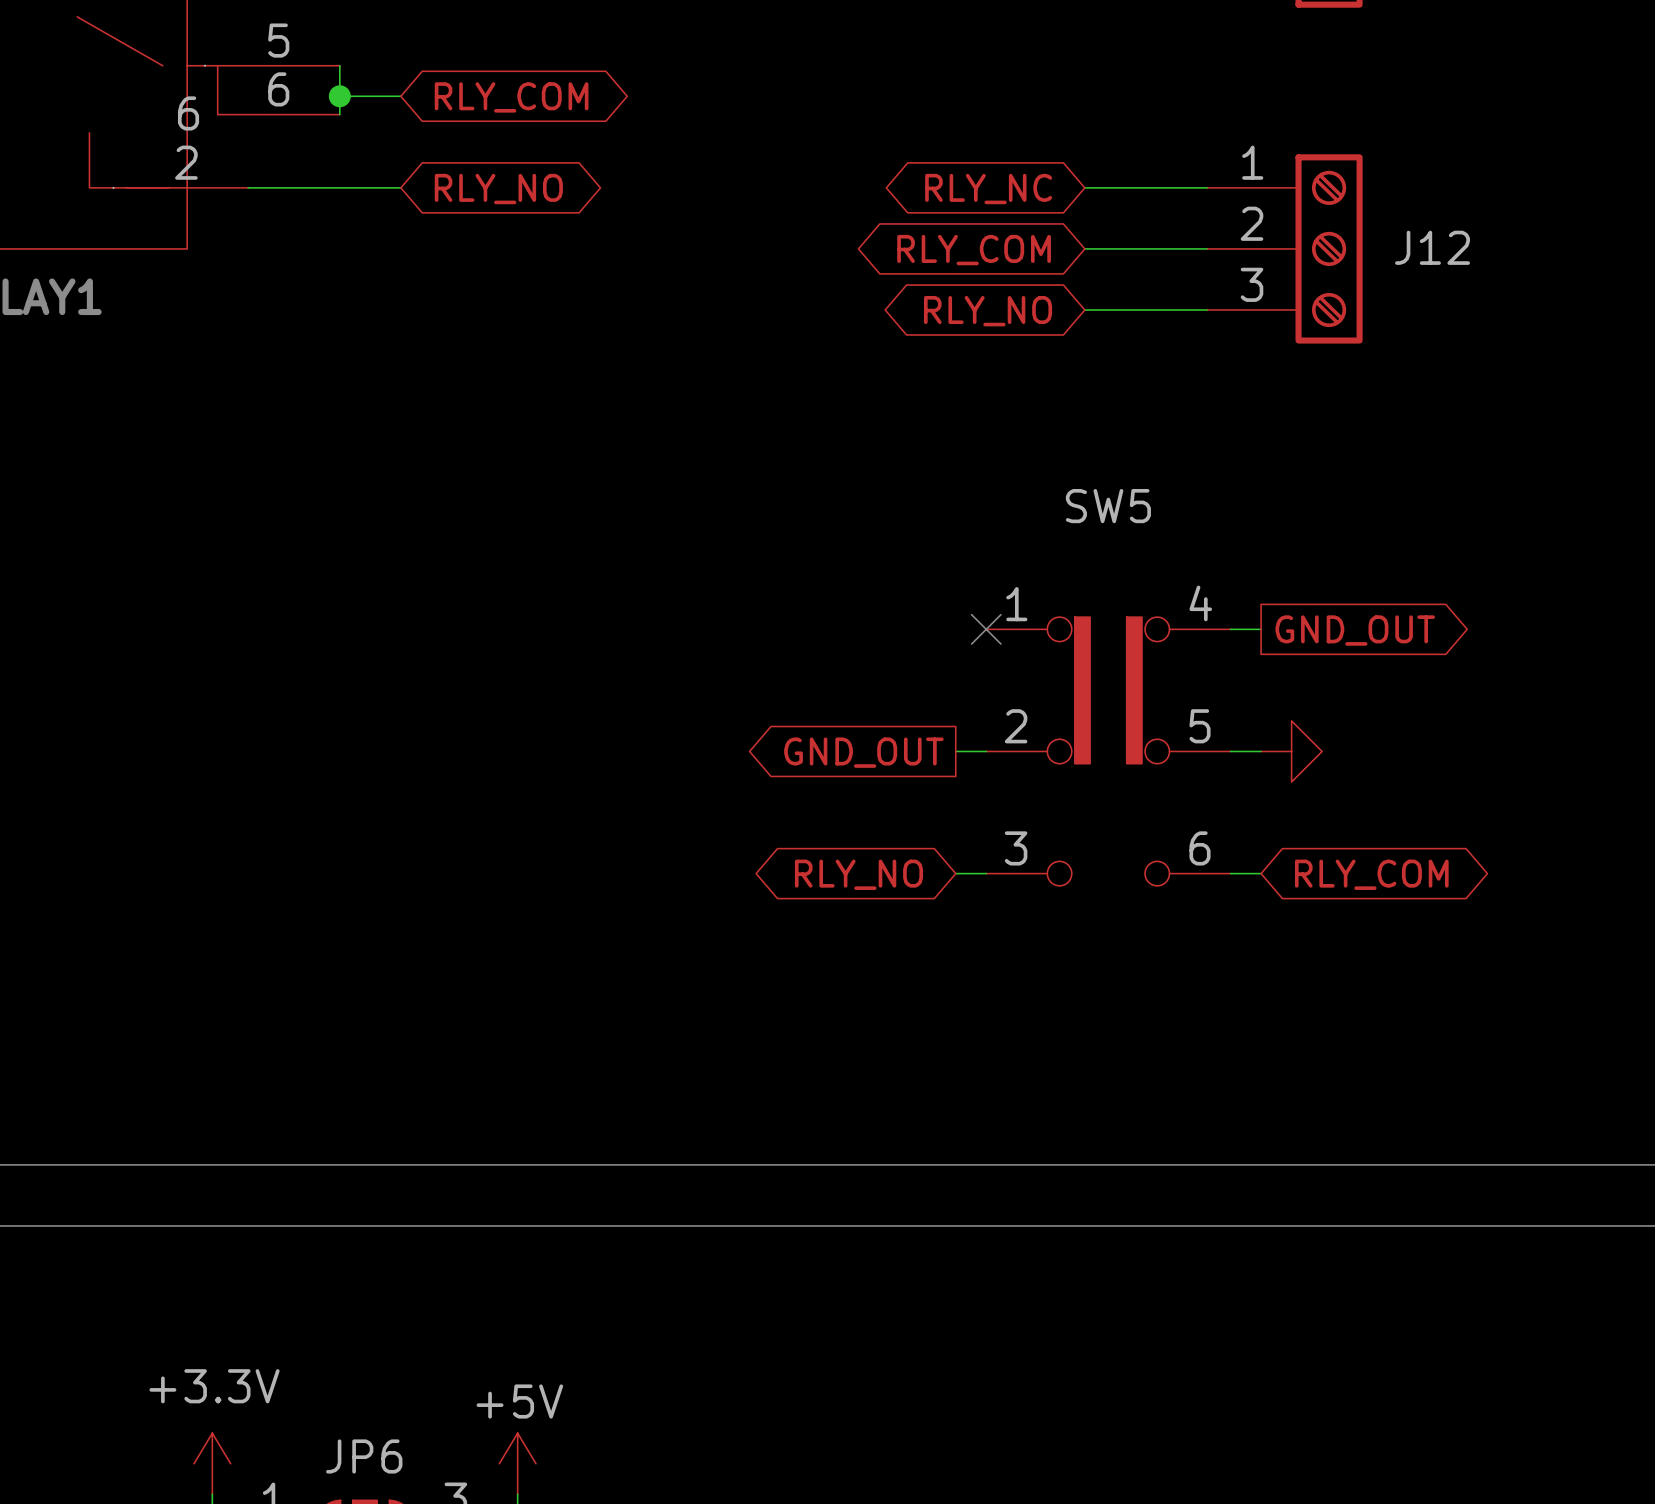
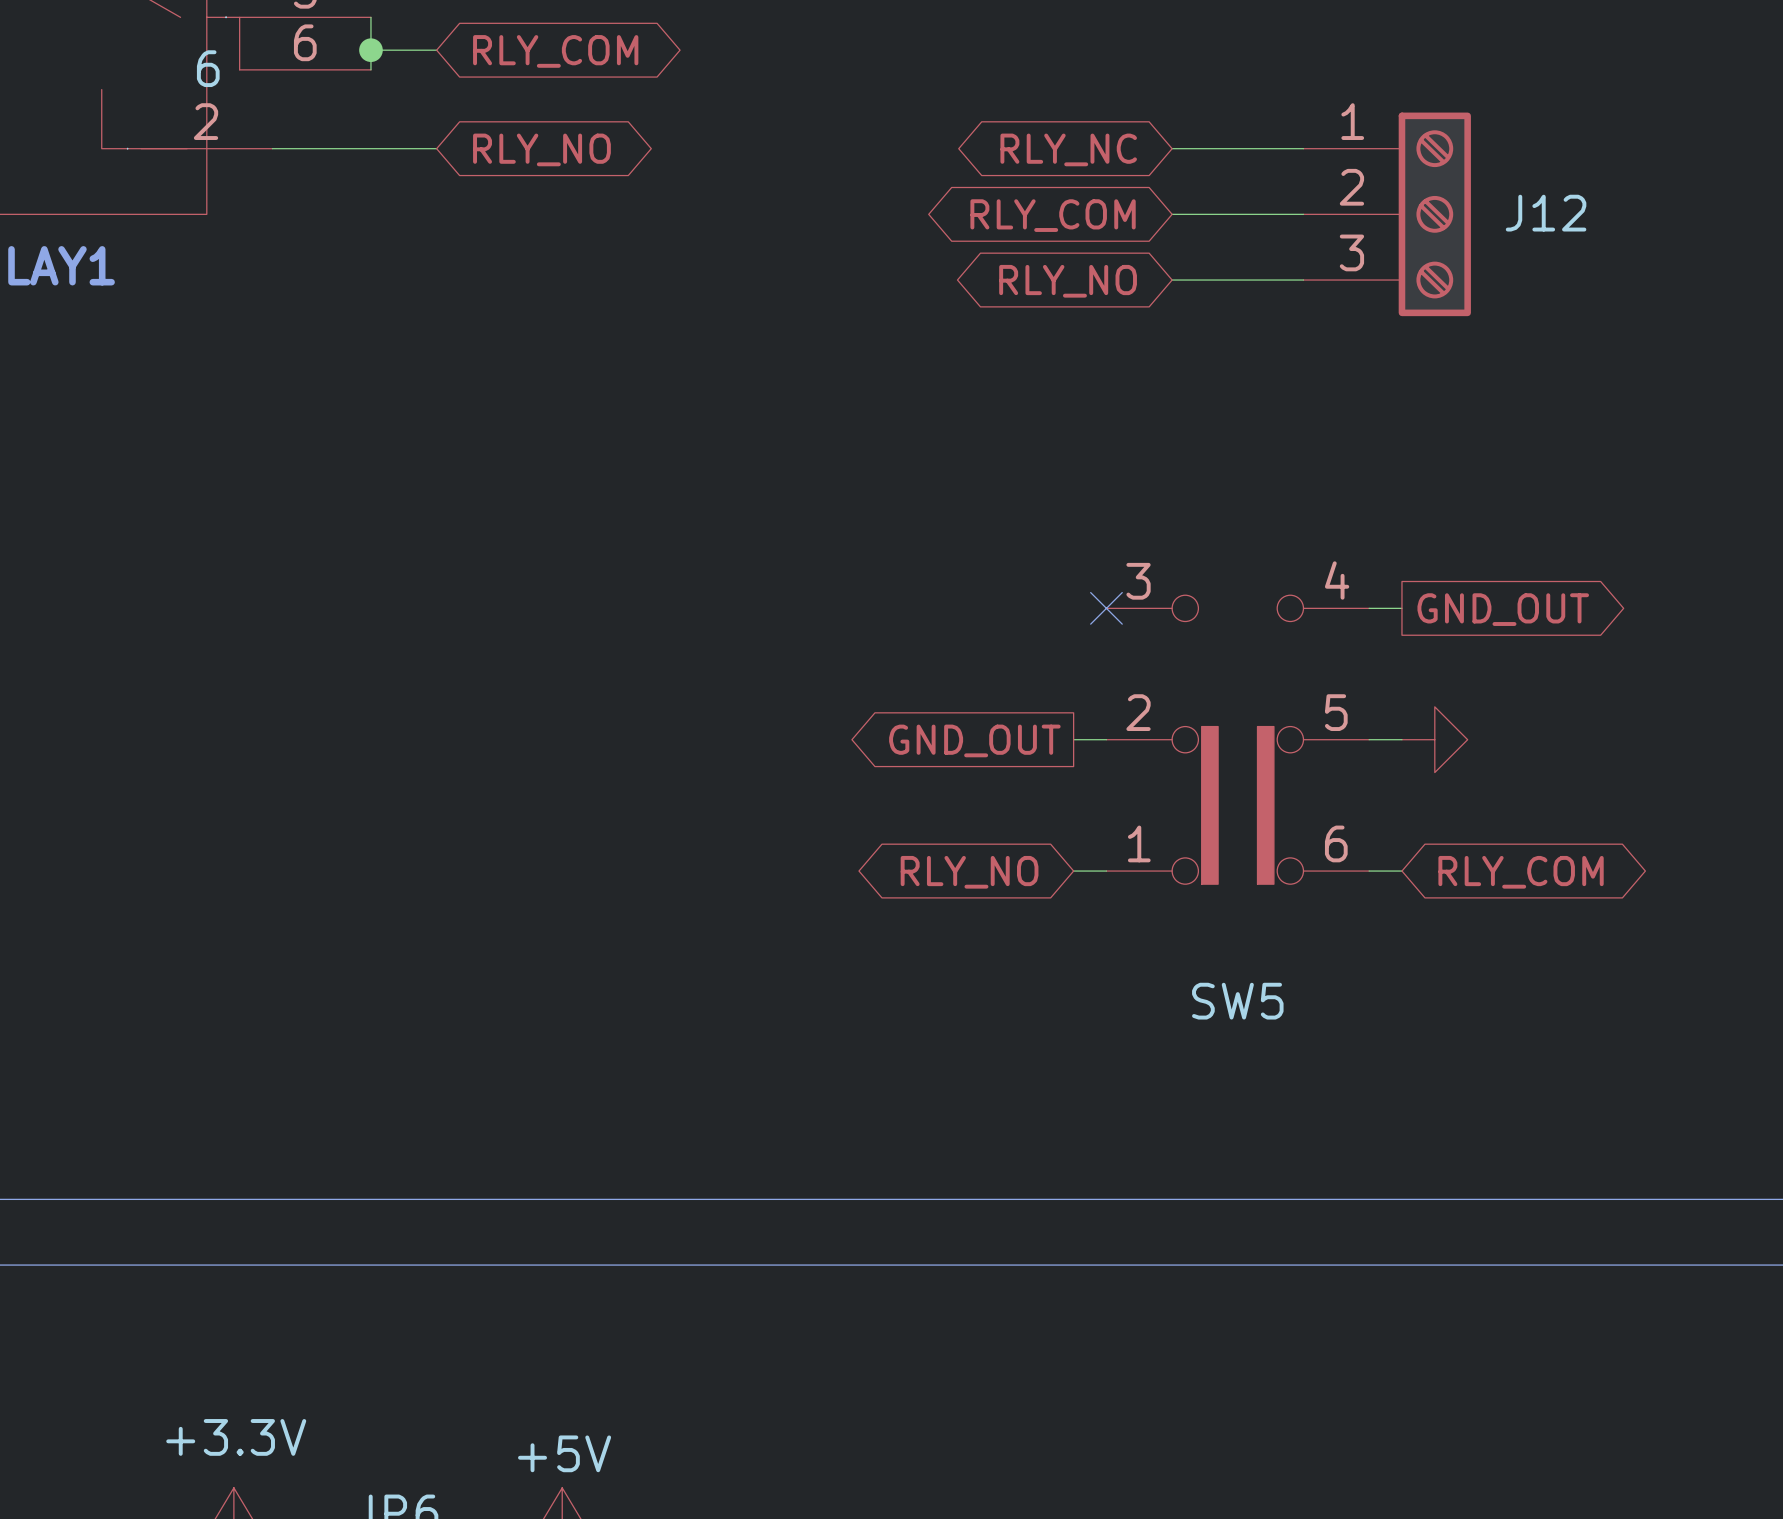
SW5 name position: SW5 (1108, 506) -> SW5 (1237, 1001)
SW5 symbol: [986, 617, 1231, 886] -> [1106, 595, 1370, 885]
no-connect mark position: (986, 629) -> (1106, 608)
wire: (1230, 629) (1261, 629) -> (1369, 608) (1401, 608)
global label position: GND_OUT (1355, 630) -> GND_OUT (1503, 609)
wire: (955, 751) (986, 751) -> (1073, 739) (1106, 739)
wire: (1230, 751) (1261, 751) -> (1369, 739) (1401, 739)
power symbol position: (1291, 751) -> (1434, 739)
global label position: GND_OUT (863, 752) -> GND_OUT (974, 740)
wire: (955, 873) (986, 873) -> (1073, 871) (1106, 871)
wire: (1230, 873) (1261, 873) -> (1369, 871) (1401, 871)
global label position: RLY_NO (858, 874) -> RLY_NO (969, 872)
global label position: RLY_COM (1371, 874) -> RLY_COM (1521, 872)

